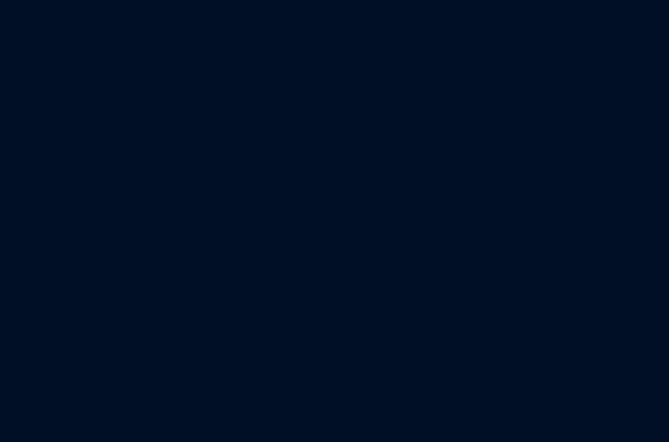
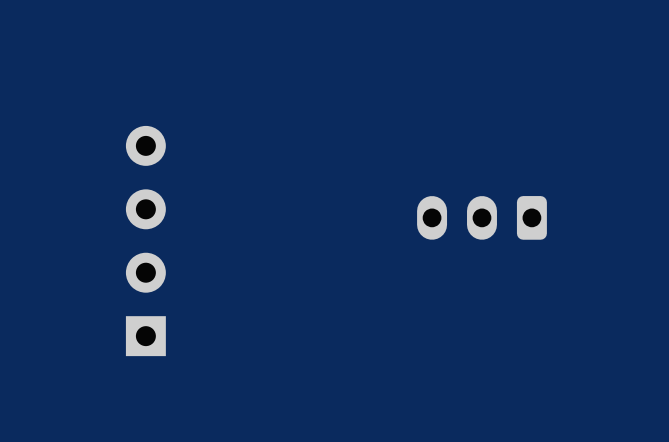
part: none -> (481, 217)
part: none -> (145, 241)

